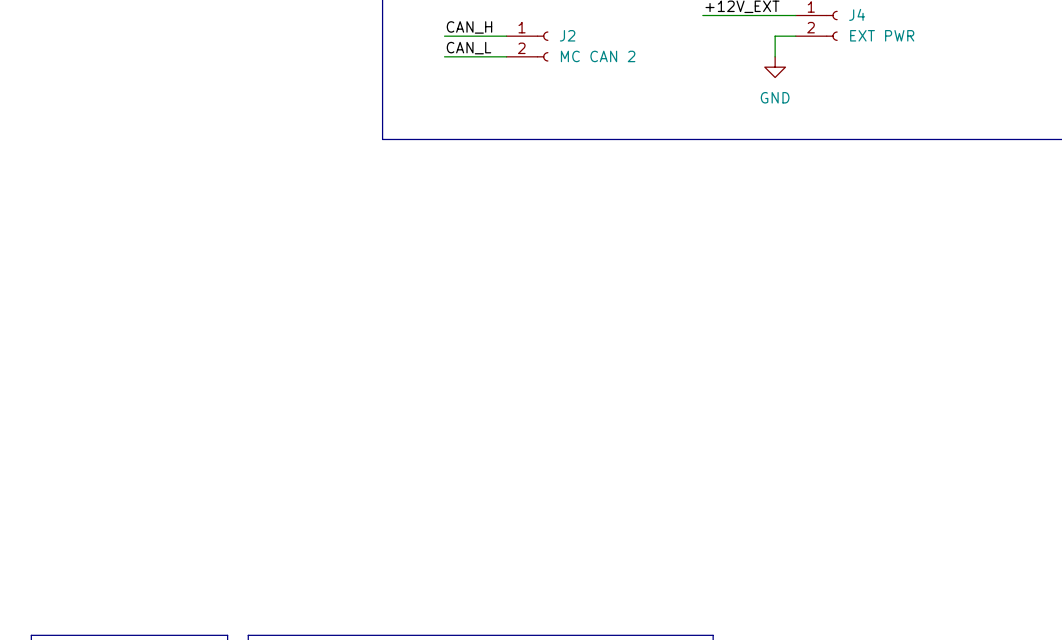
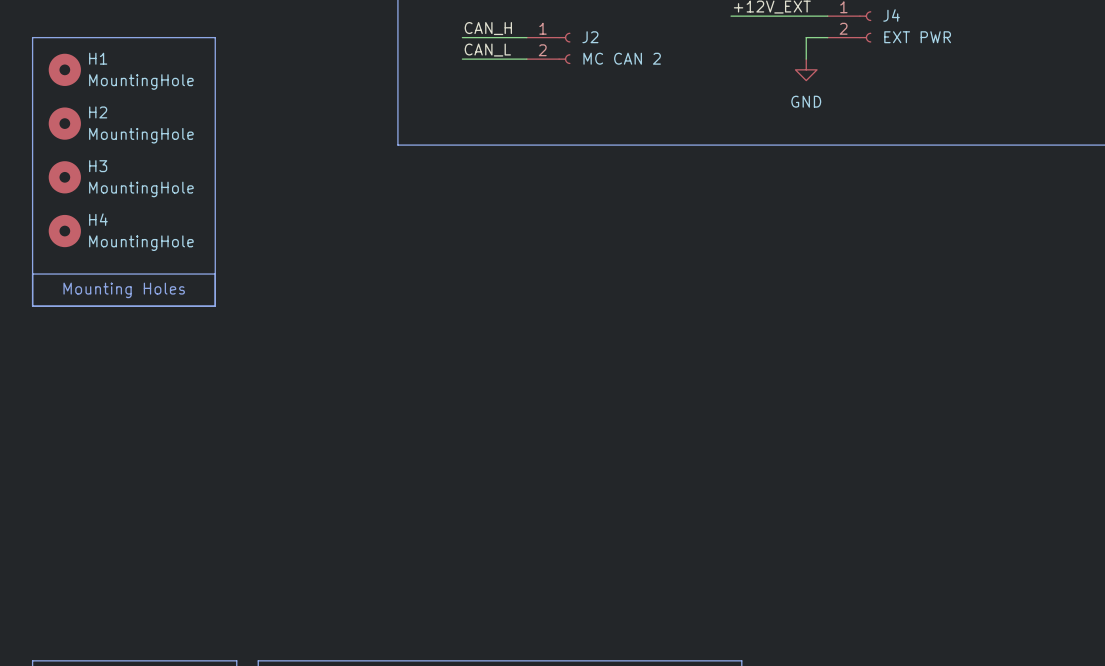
line: none -> (32, 37) (215, 37) (215, 306) (32, 306) (32, 37)
H1: none -> MountingHole (64, 69)
H2: none -> MountingHole (64, 123)
H3: none -> MountingHole (64, 177)
H4: none -> MountingHole (64, 231)
line: none -> (32, 274) (215, 274)
text: none -> Mounting Holes (124, 290)

